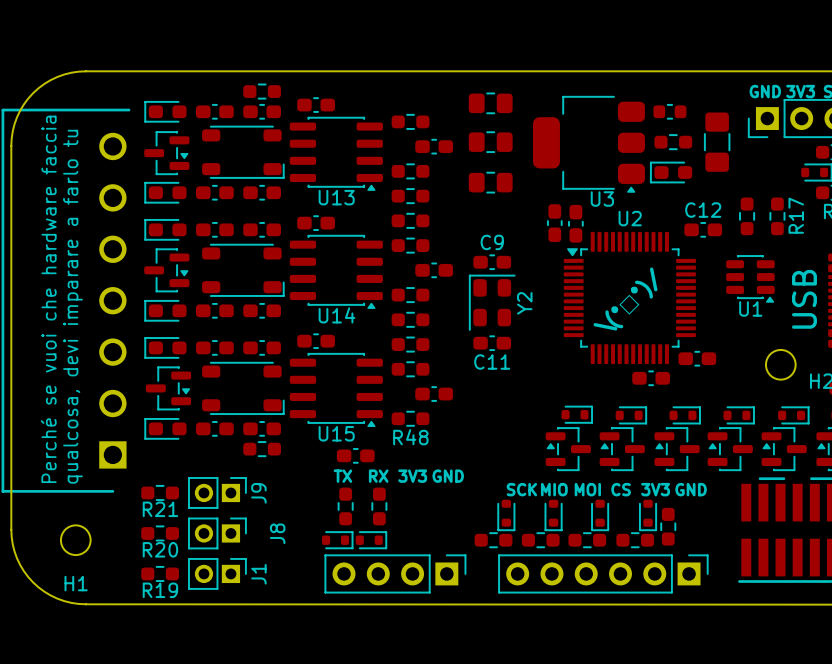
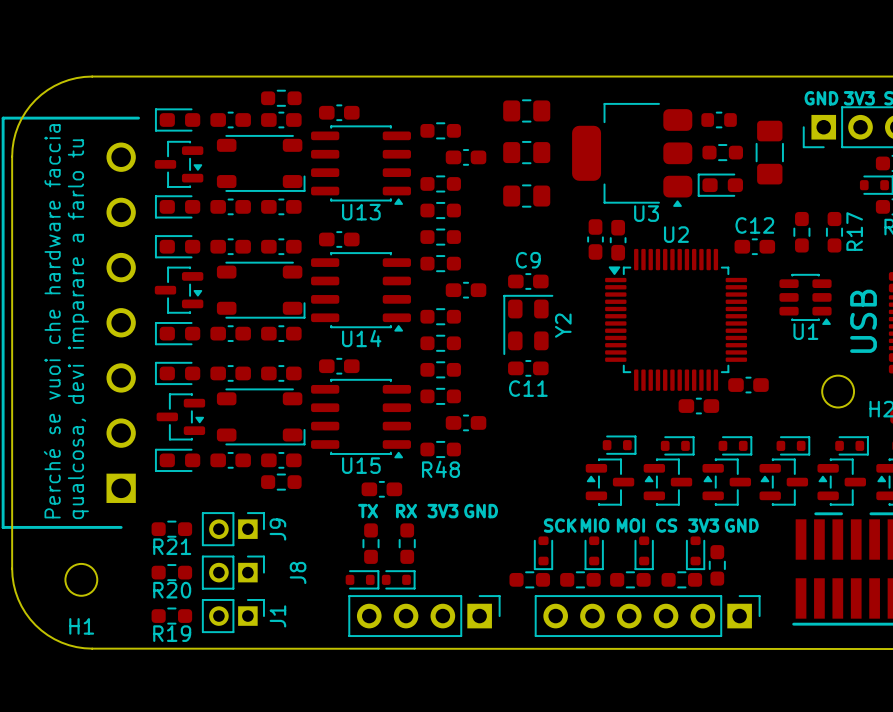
text: \(°□°)/ (625, 299) -> none

